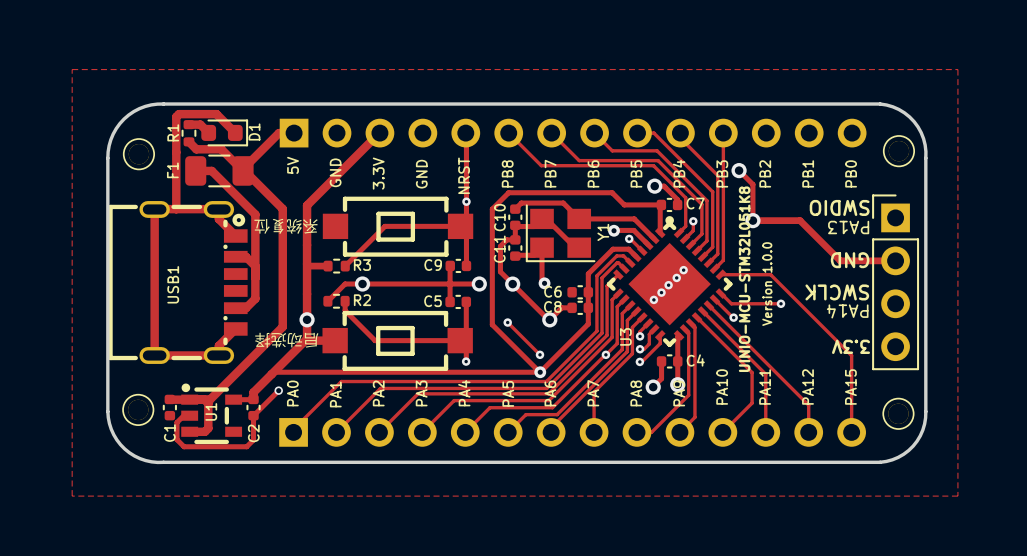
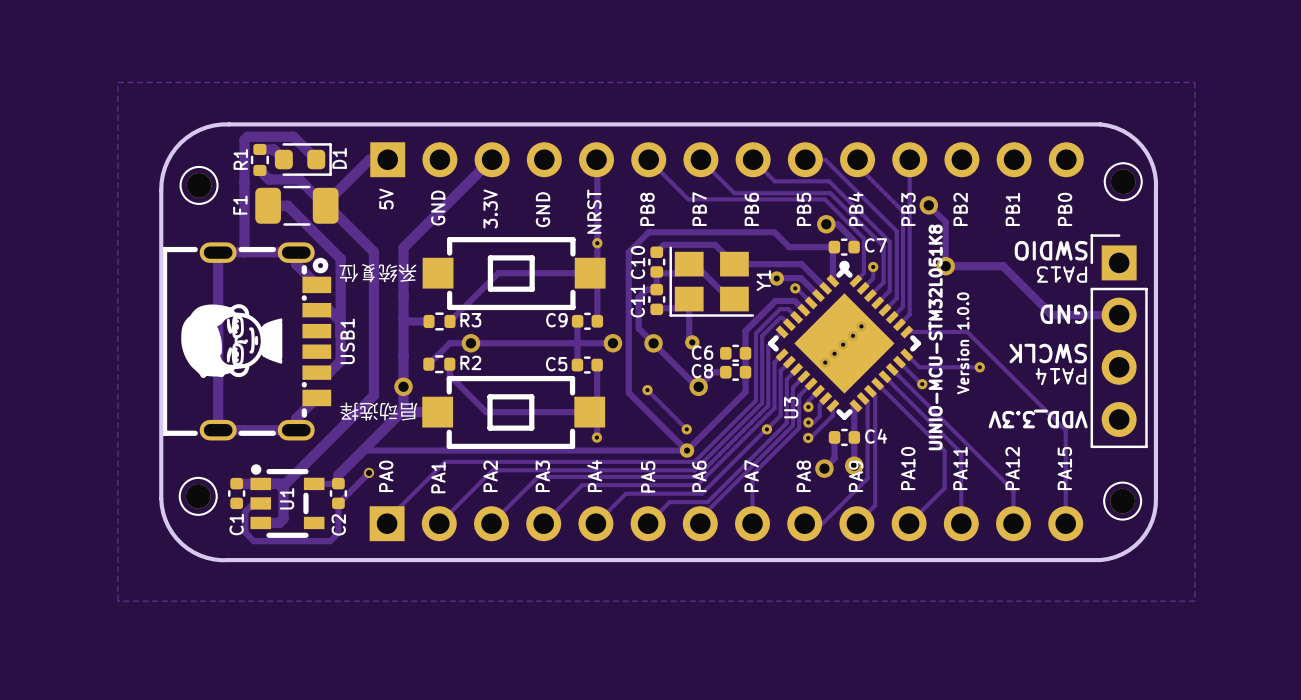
drawing: none -> [181, 304, 283, 378]
USB1 name position: USB1 (173, 284) -> USB1 (347, 341)
text: 3.3V (851, 346) -> VDD_3.3V (1038, 418)

